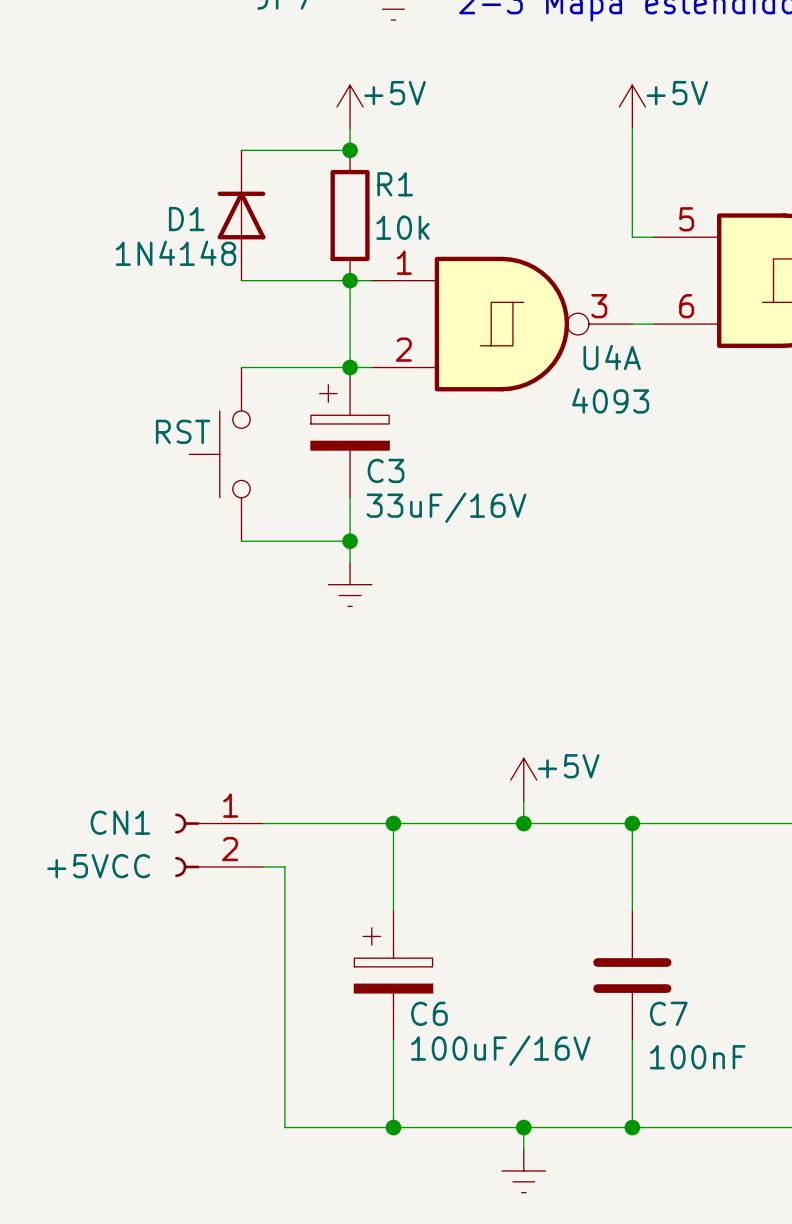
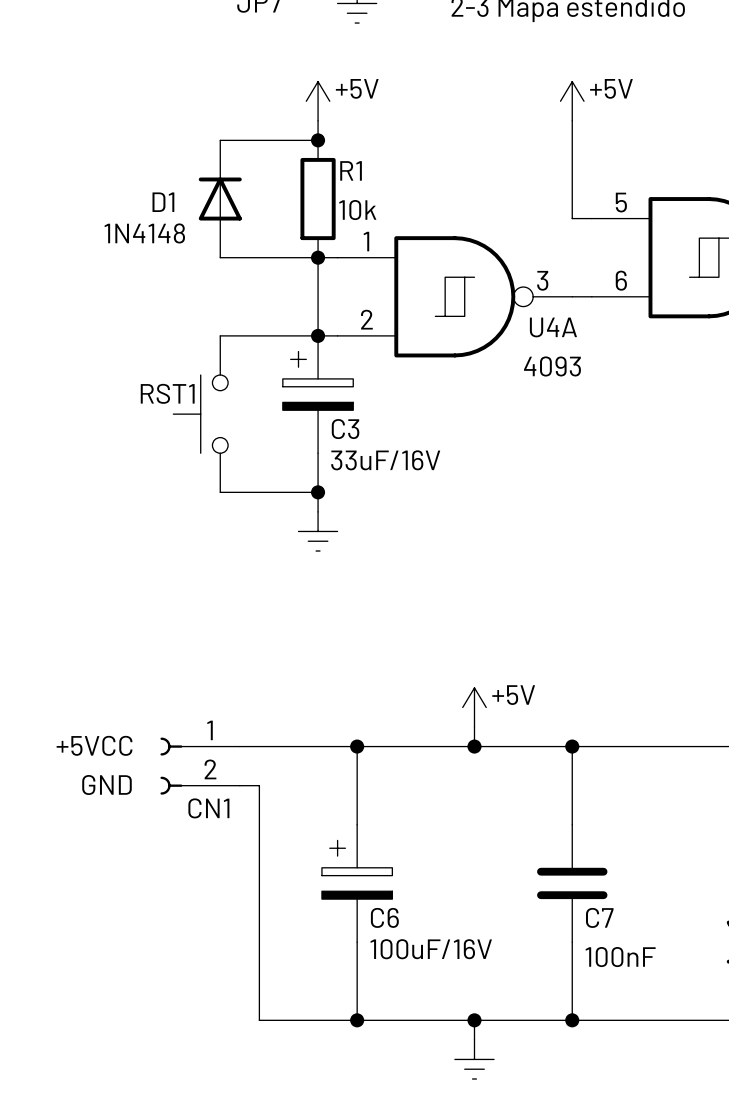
RST name: RST (183, 431) -> RST1 (167, 393)
CN1 name position: CN1 (120, 822) -> CN1 (208, 808)
CN1 value position: +5VCC (98, 866) -> +5VCC (94, 745)
text: none -> GND (106, 785)

